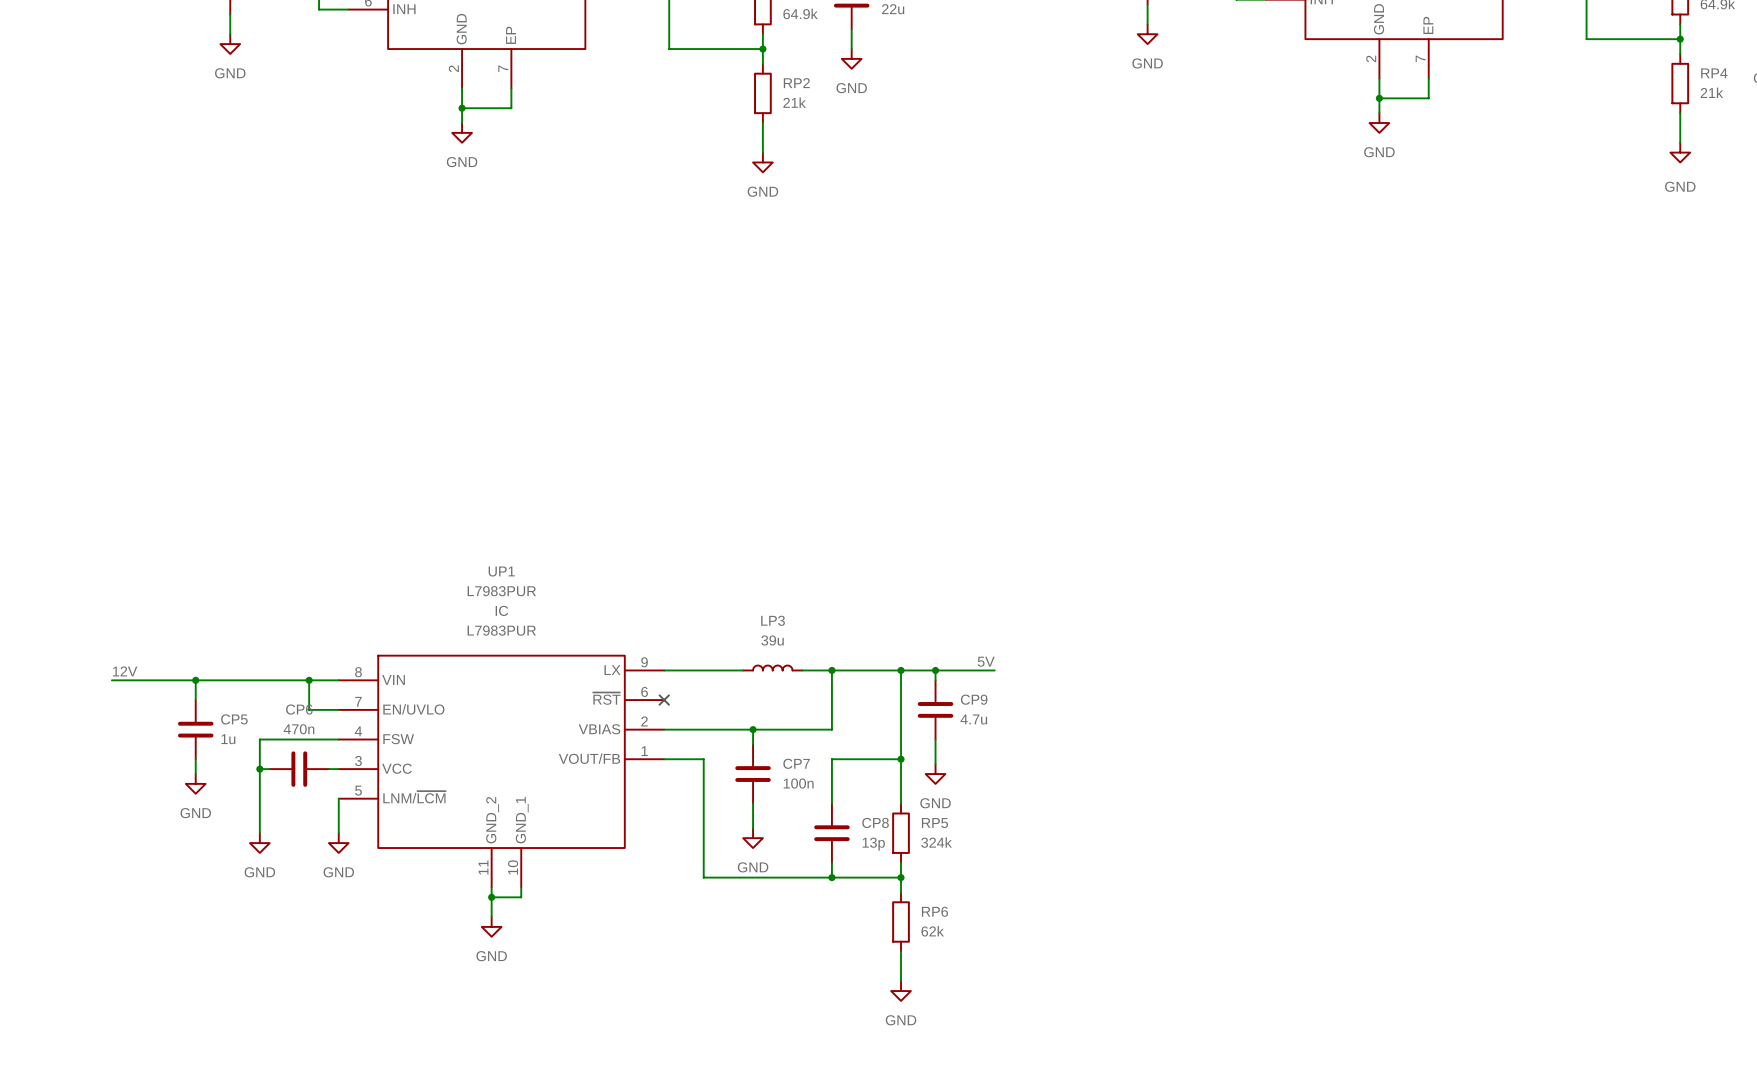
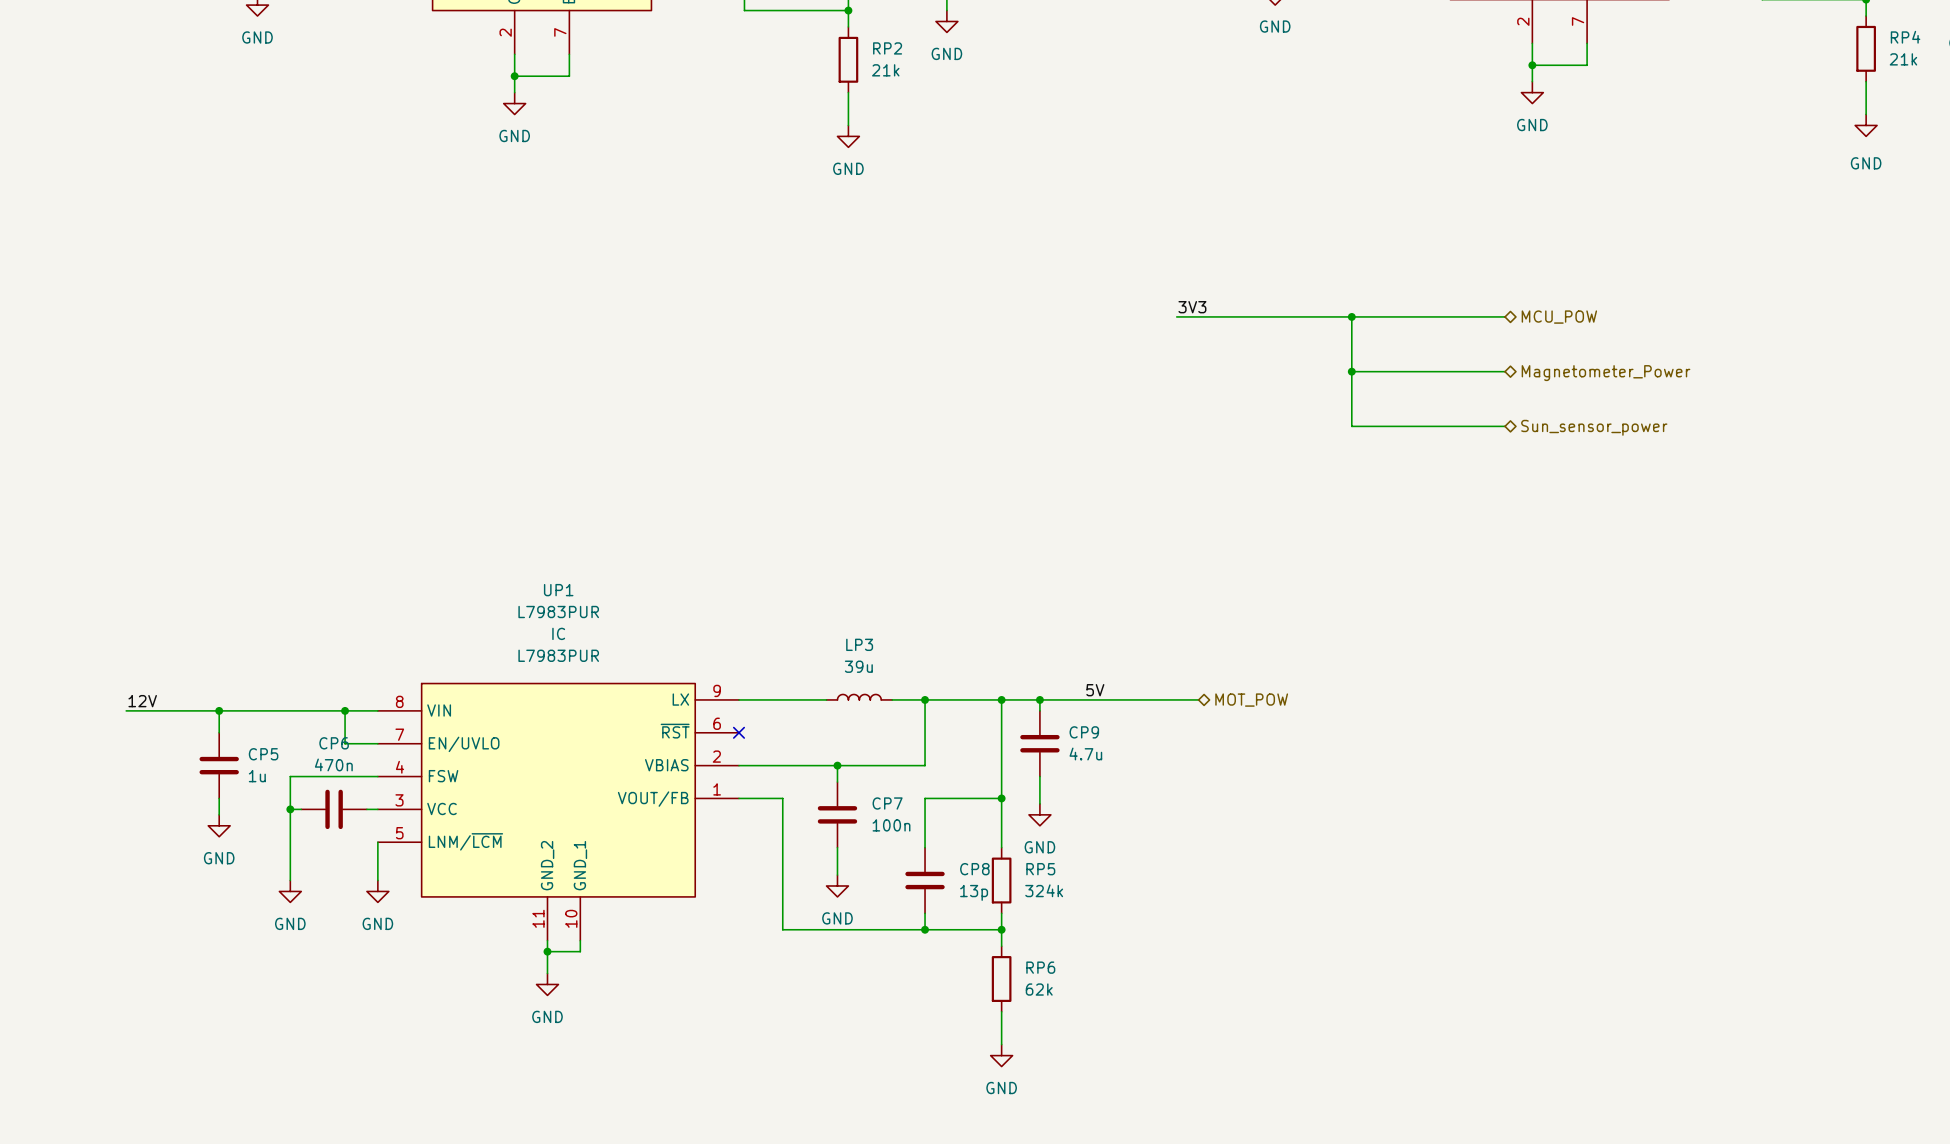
label: none -> 3V3 (1192, 307)
wire: none -> (1176, 316) (1505, 316)
wire: none -> (1351, 316) (1351, 426) (1505, 426)
junction: none -> (1351, 316)
hierarchical label: none -> MCU_POW (1559, 317)
wire: none -> (1351, 371) (1505, 371)
junction: none -> (1351, 371)
hierarchical label: none -> Magnetometer_Power (1606, 373)
hierarchical label: none -> Sun_sensor_power (1594, 427)
wire: none -> (1105, 699) (1198, 699)
hierarchical label: none -> MOT_POW (1251, 700)

